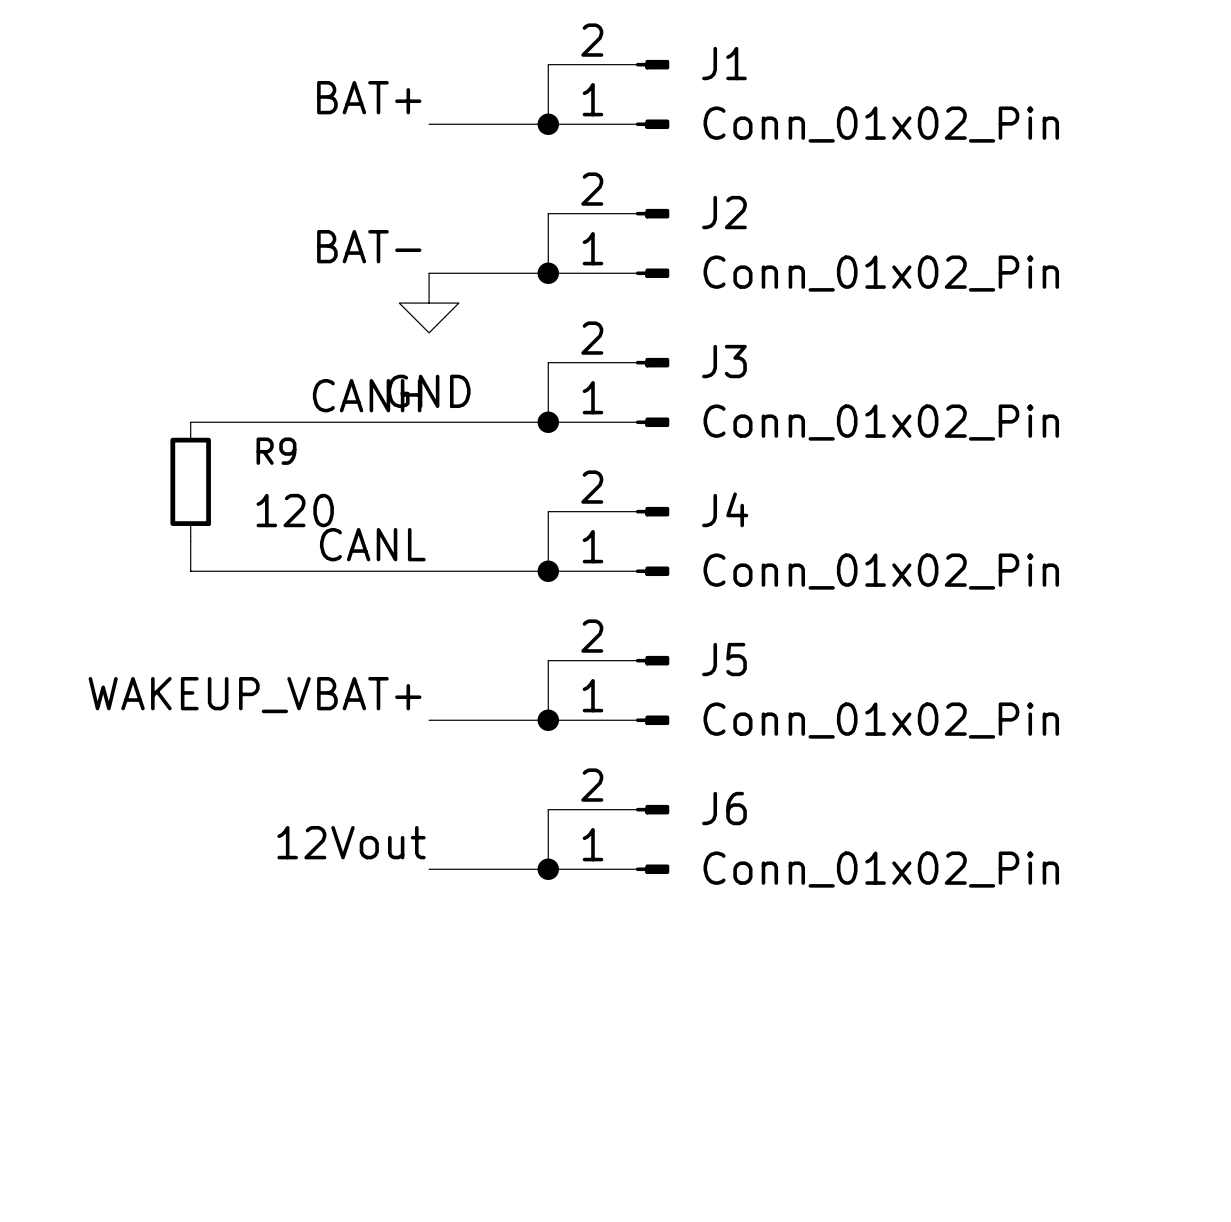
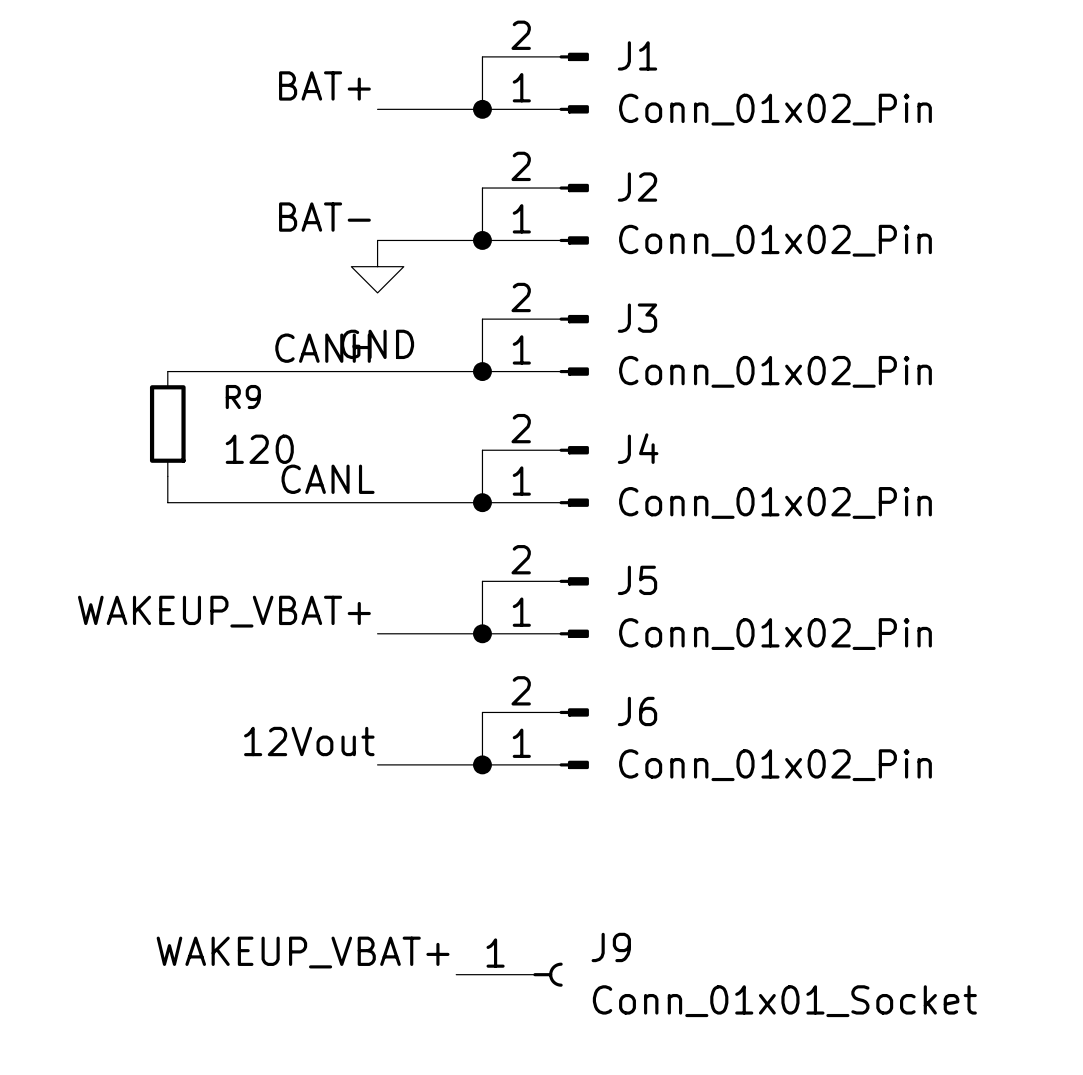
label: none -> WAKEUP_VBAT+ (303, 952)
J9: none -> Conn_01x01_Socket (509, 974)

